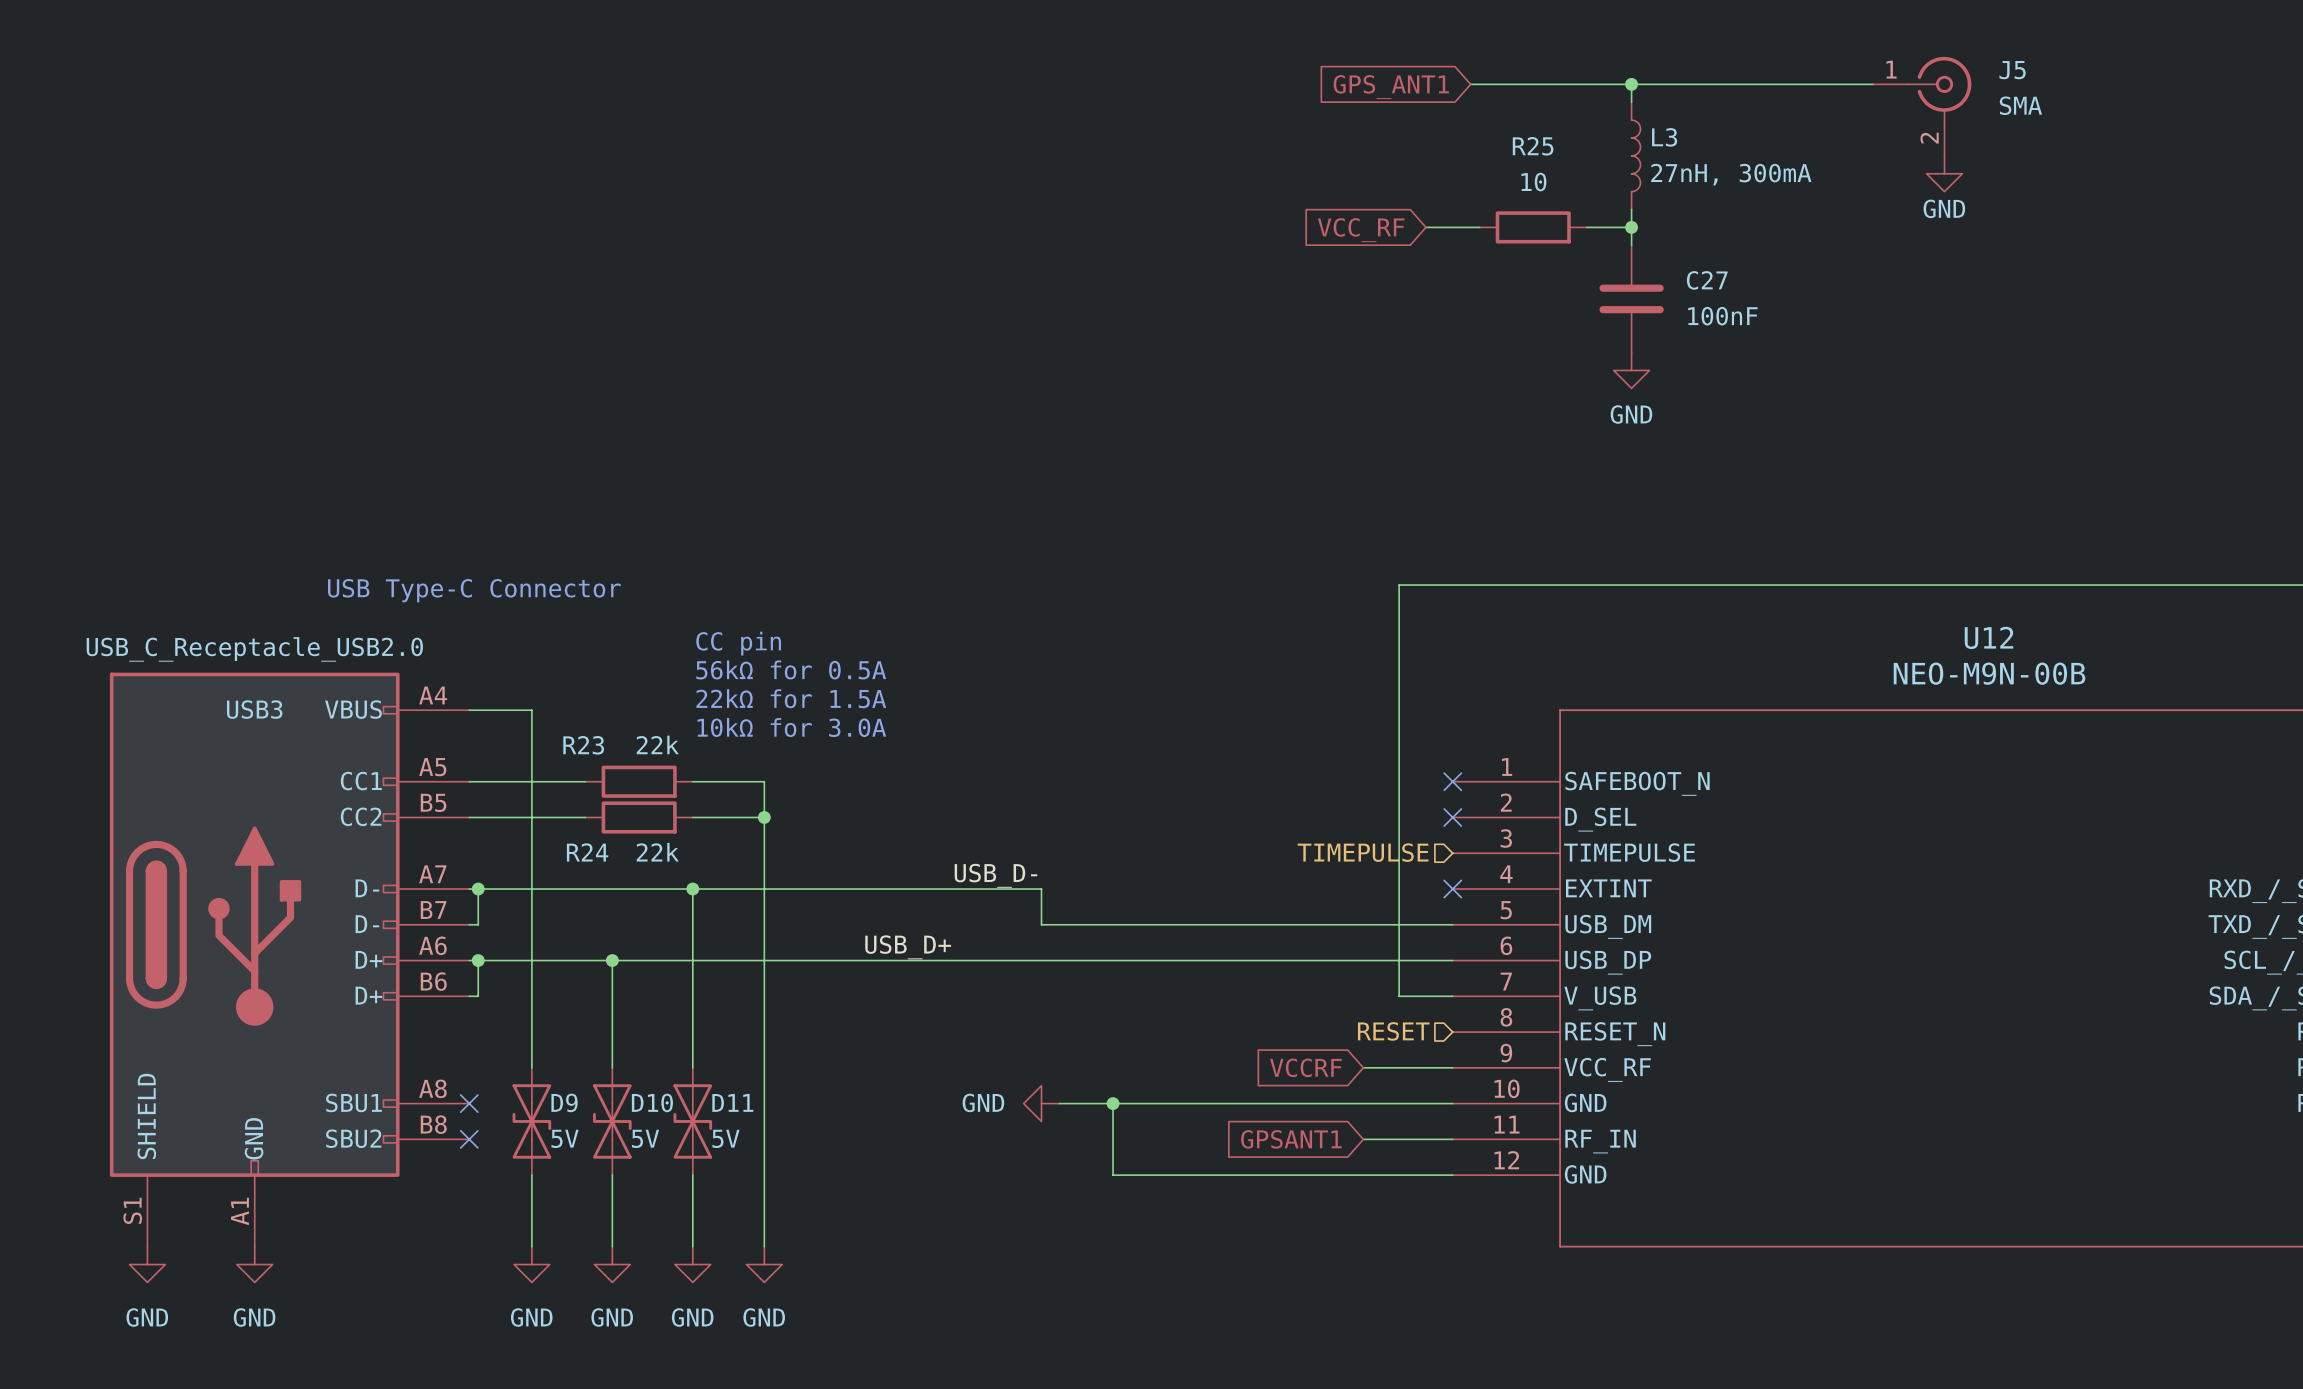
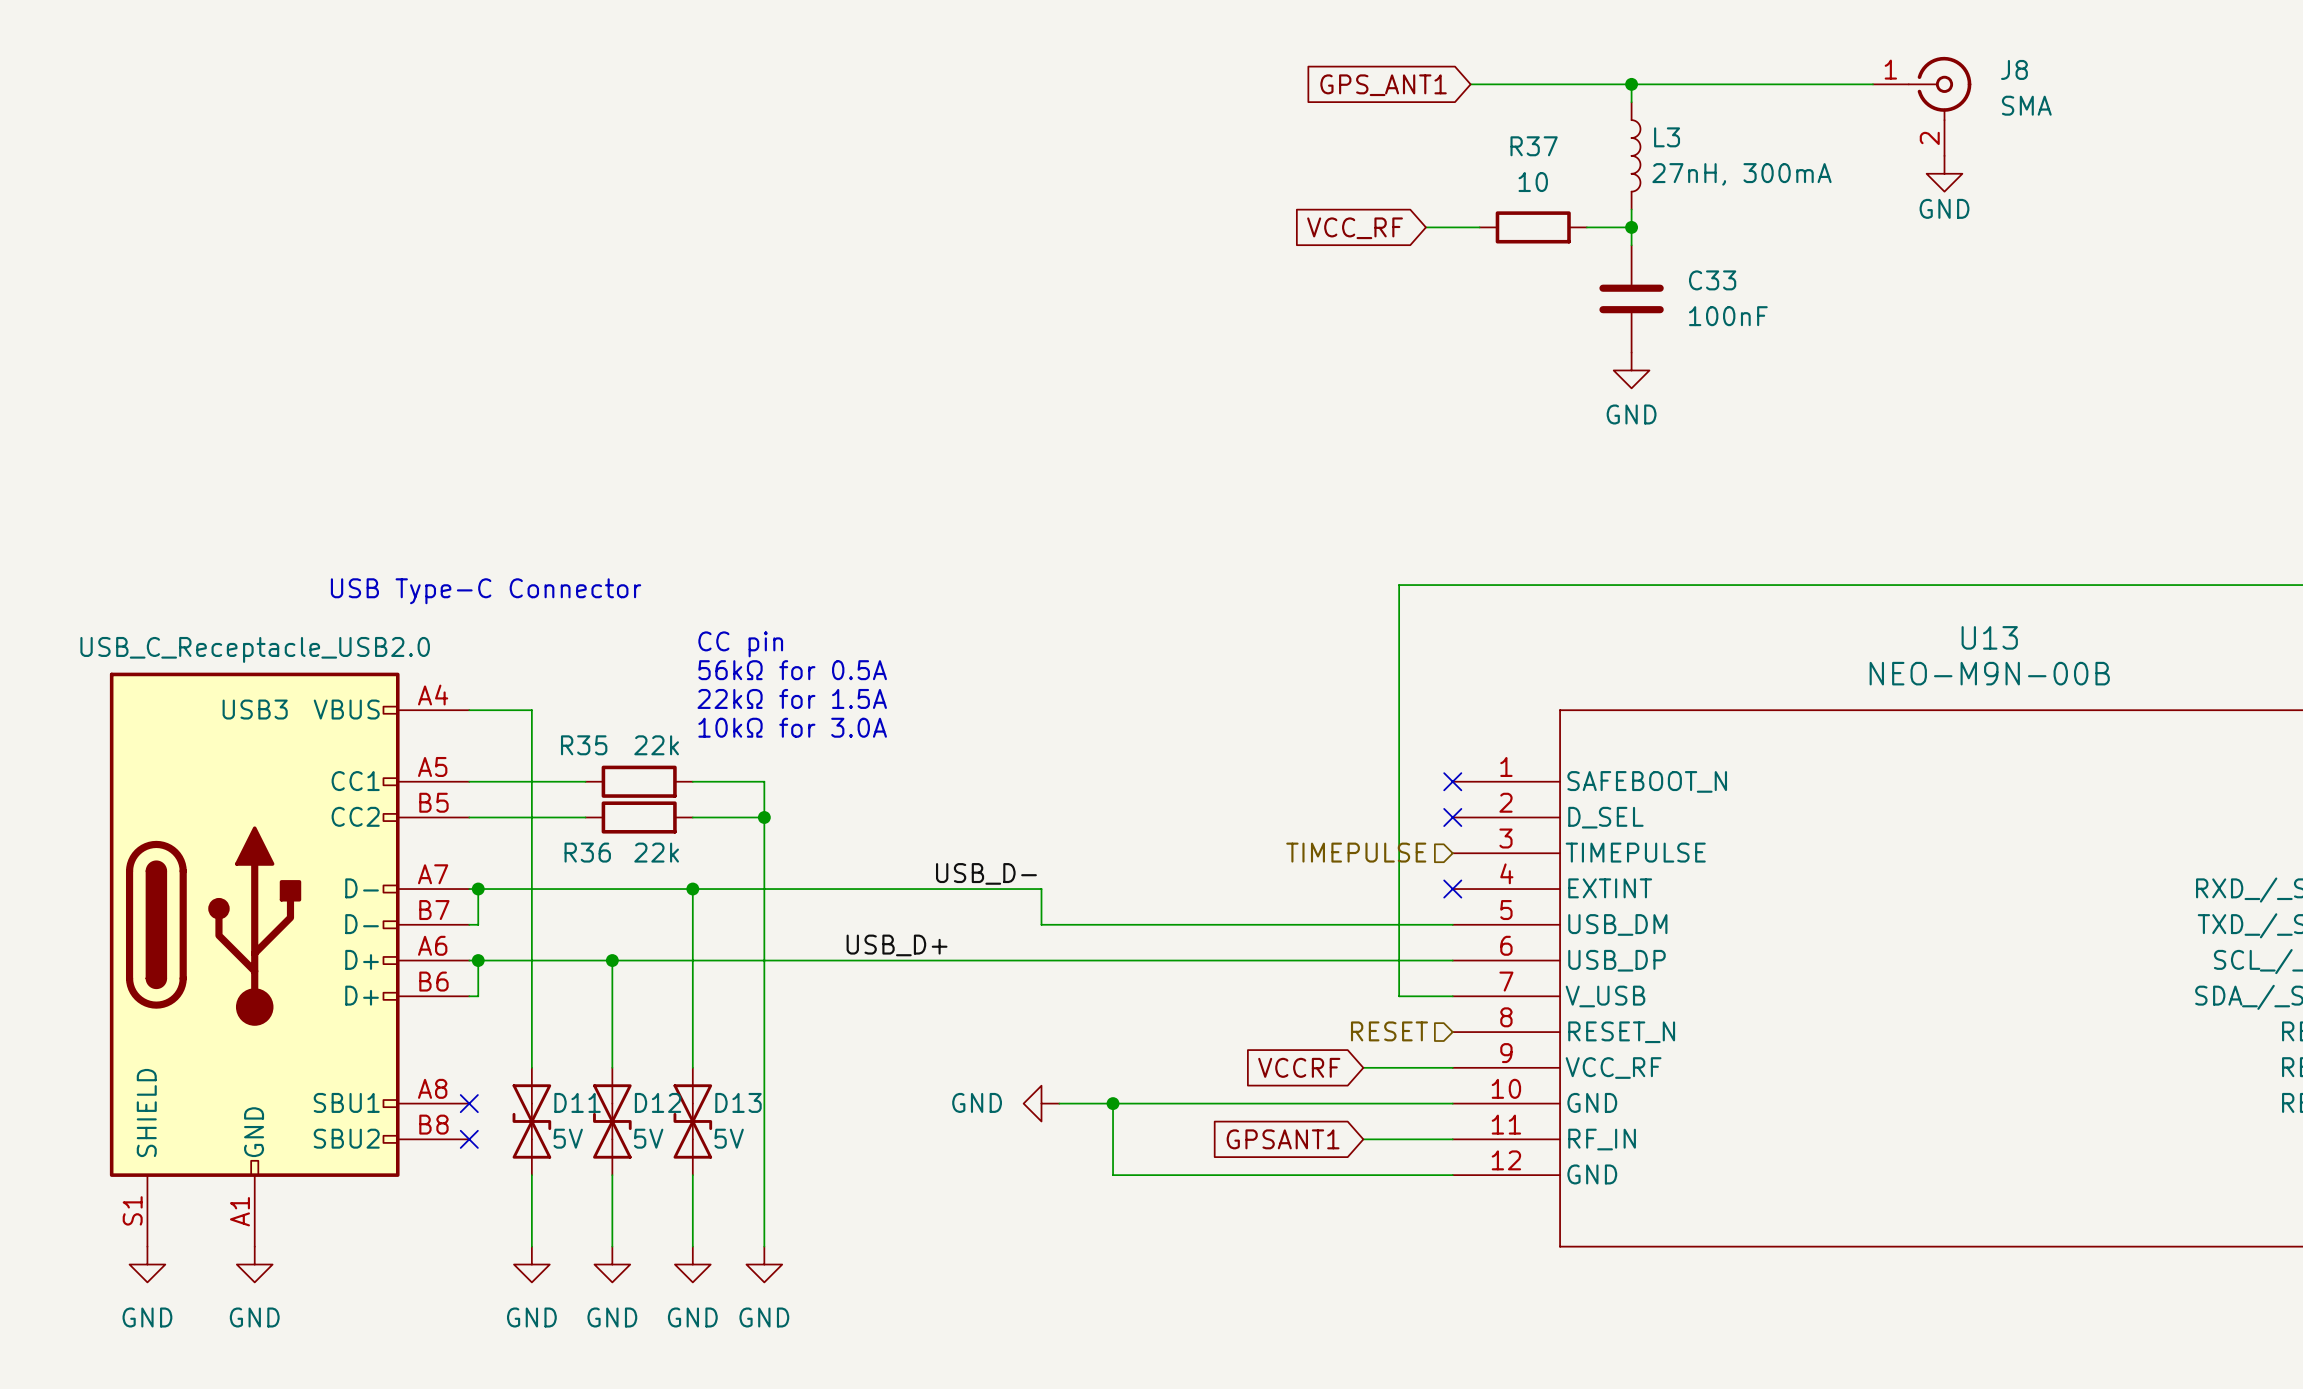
J5 name: J5 (2012, 70) -> J8 (2014, 69)
R25 name: R25 (1533, 146) -> R37 (1534, 146)
C27 name: C27 (1707, 280) -> C33 (1712, 280)
U12 name: U12 (1989, 637) -> U13 (1989, 637)
R23 name: R23 (583, 745) -> R35 (584, 745)
R24 name: R24 (587, 852) -> R36 (587, 852)
D9 name: D9 (564, 1102) -> D11 (577, 1102)
D10 name: D10 (652, 1102) -> D12 (658, 1102)
D11 name: D11 (732, 1102) -> D13 (738, 1102)

